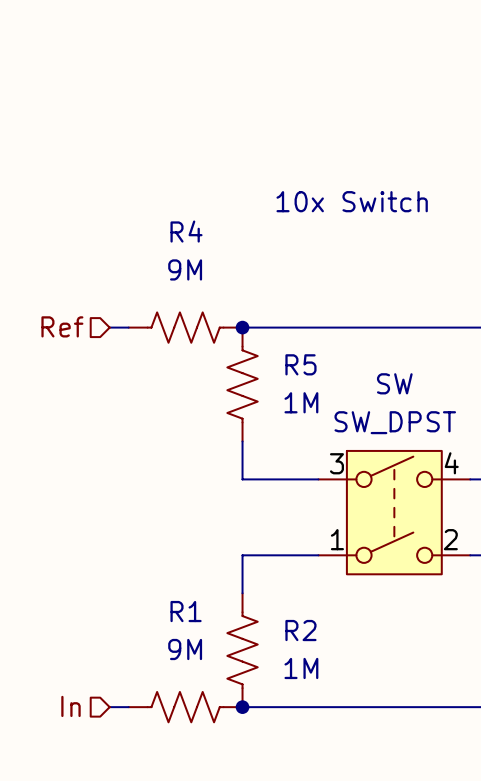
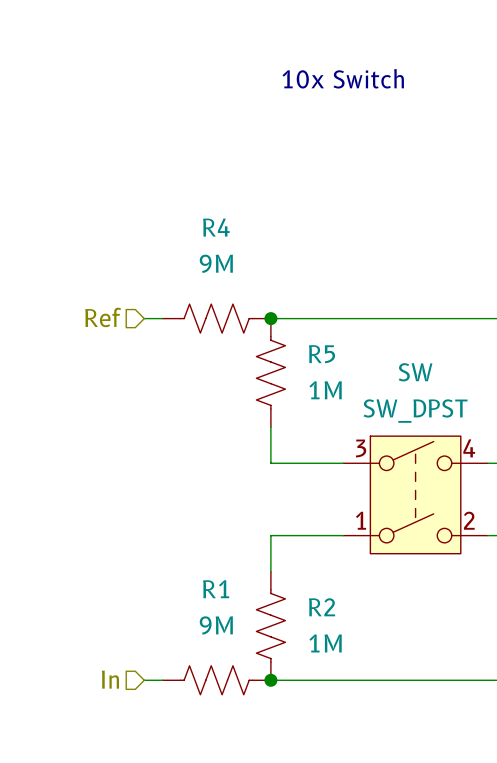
text position: 10x Switch (352, 201) -> 10x Switch (343, 78)

